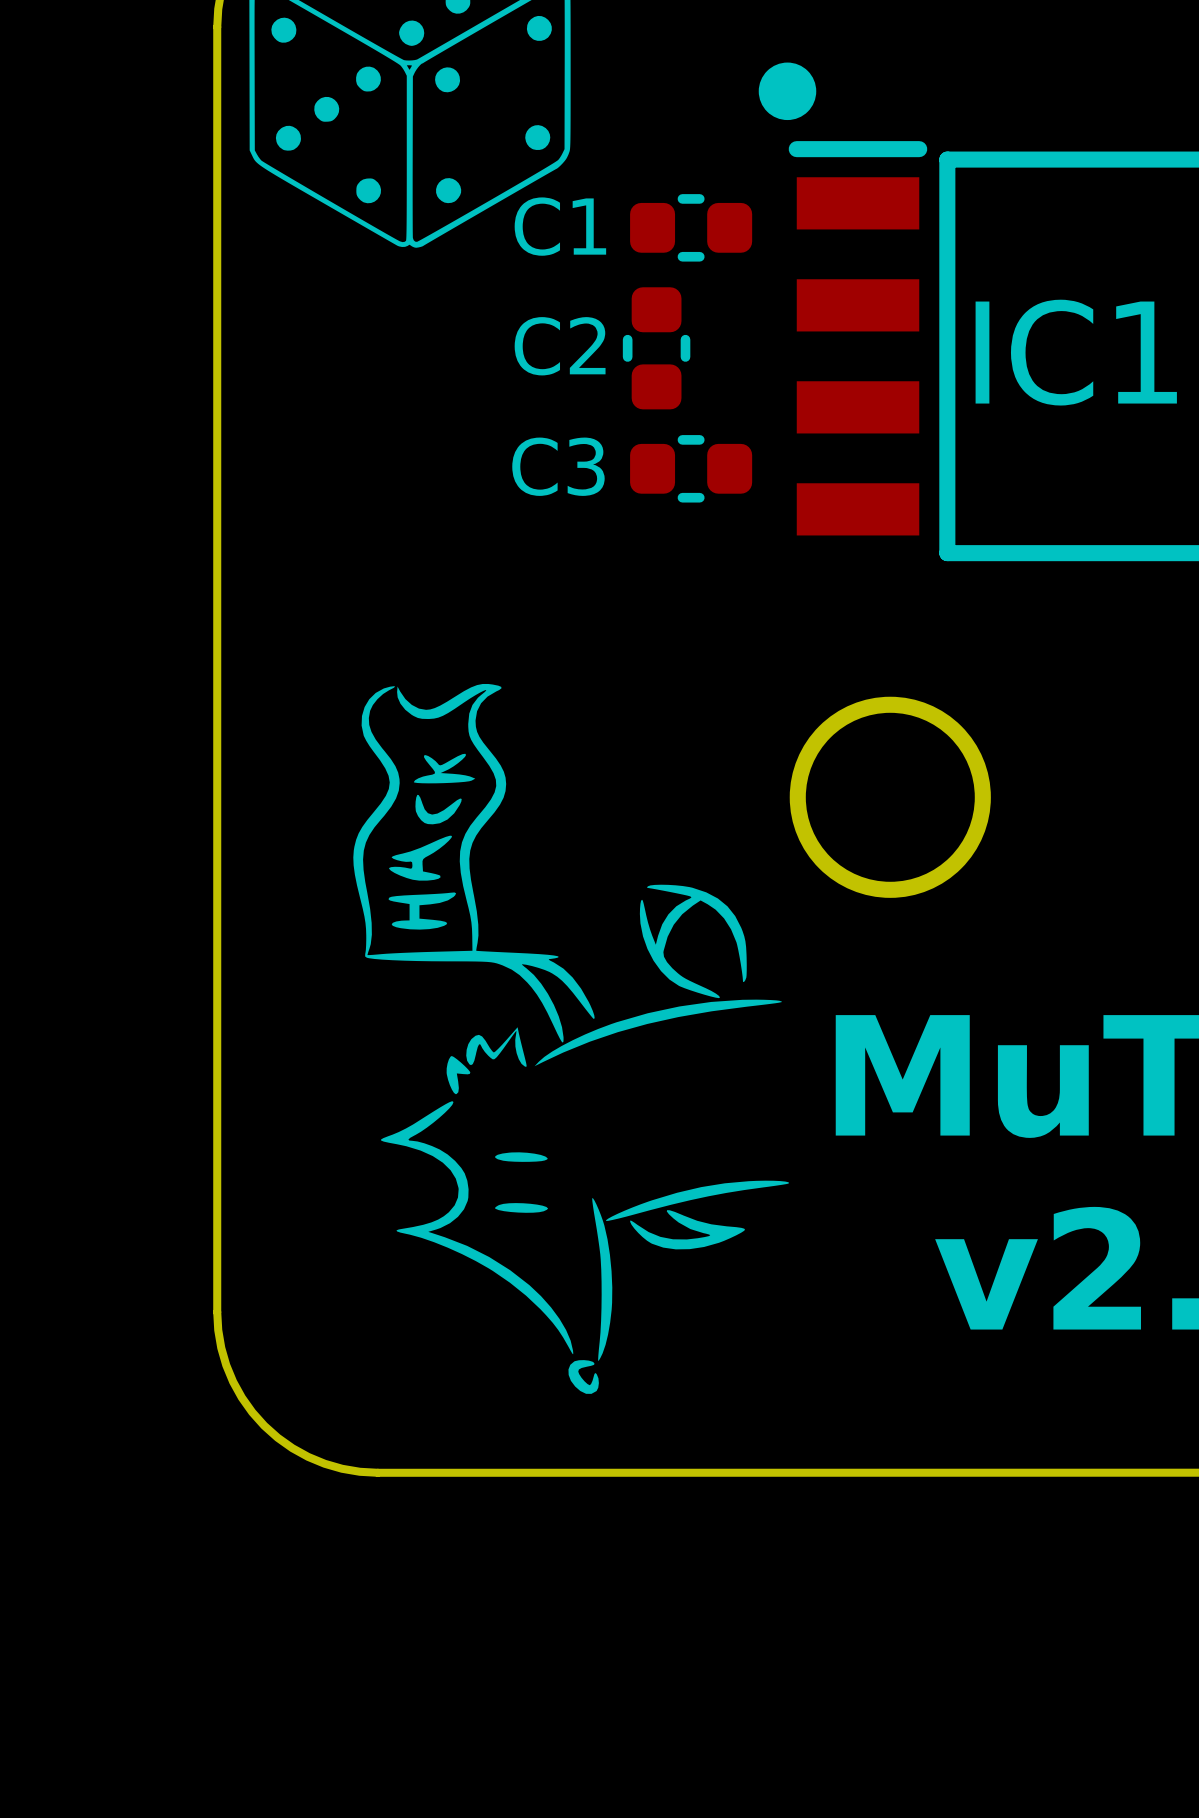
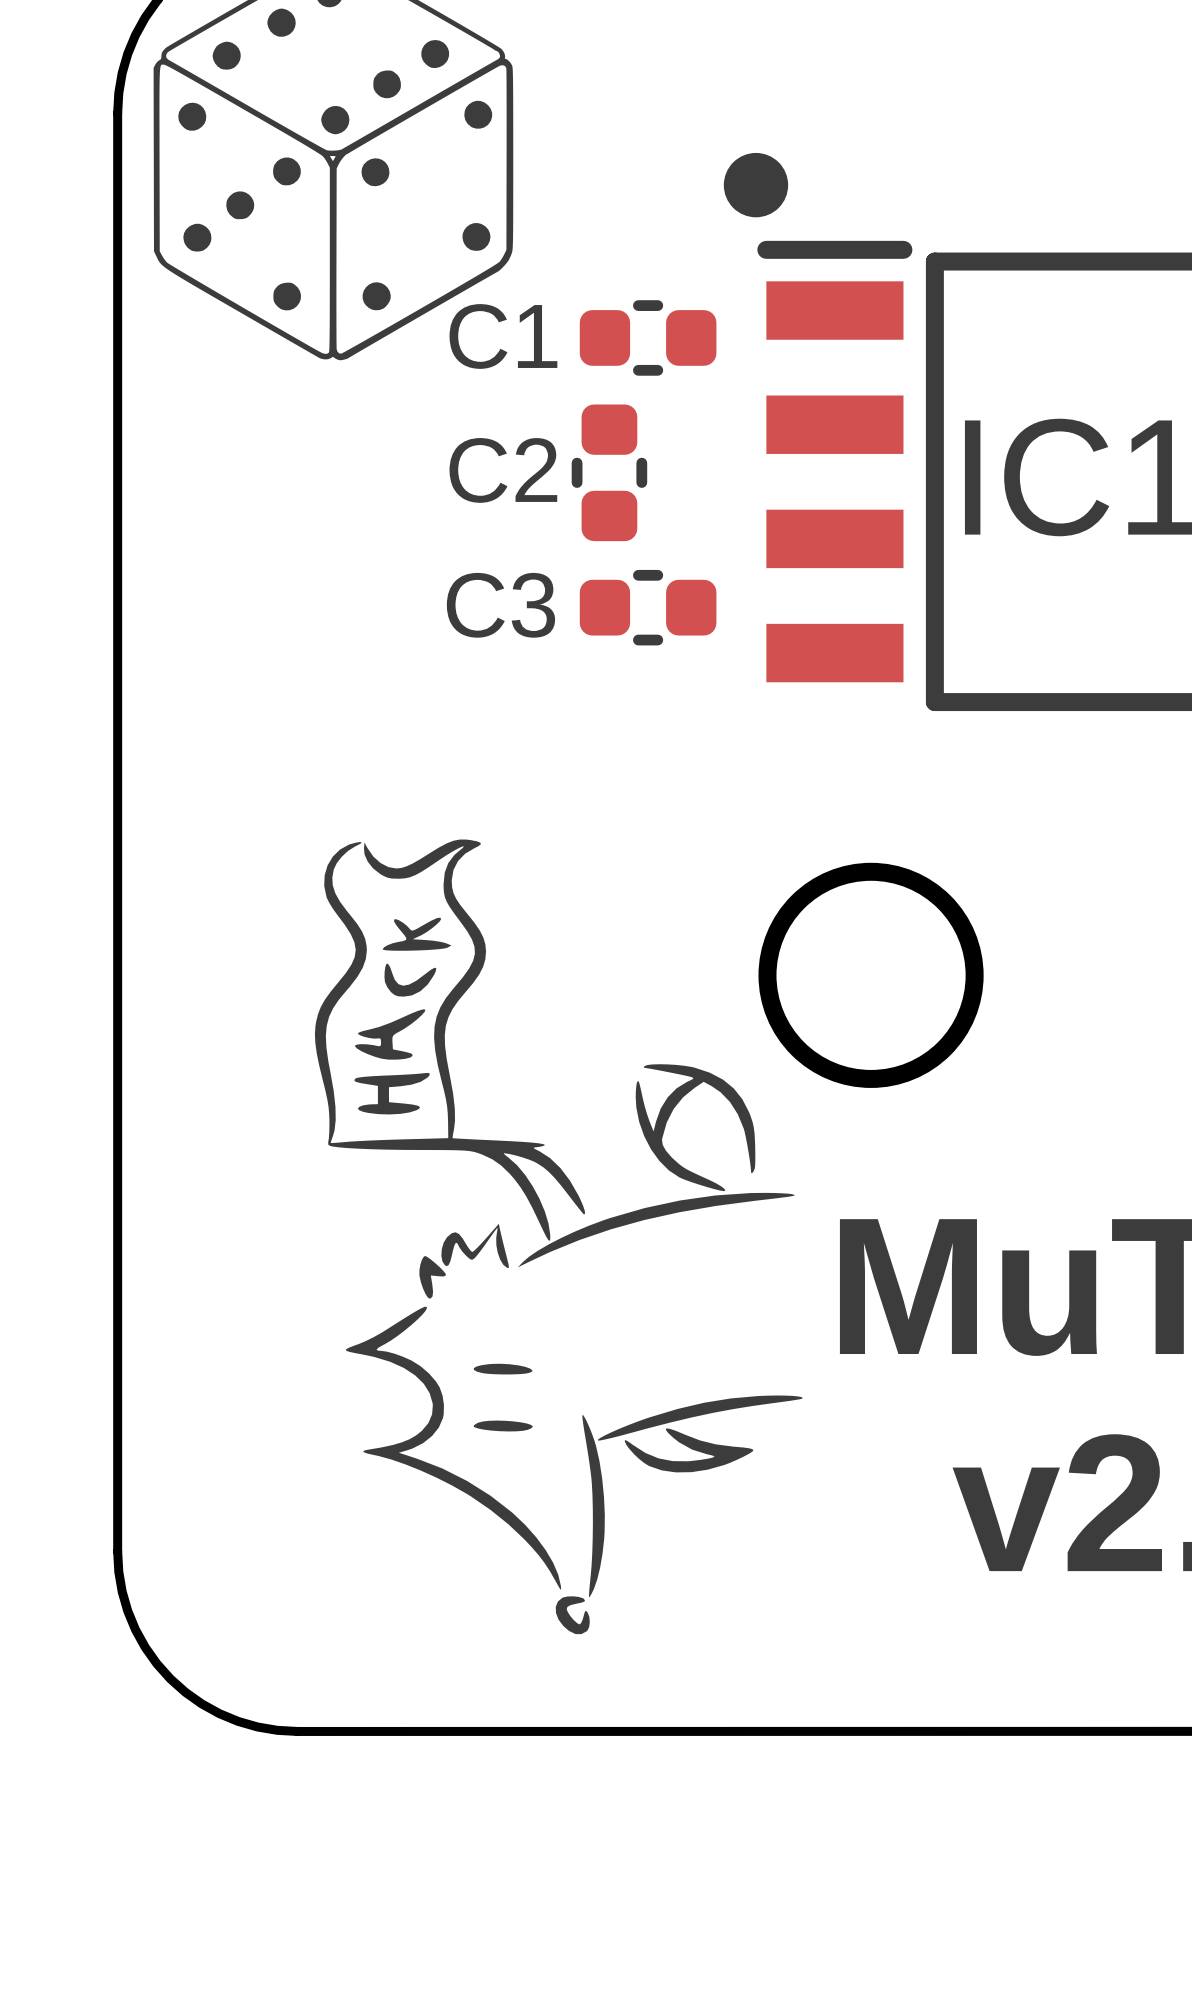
drawing position: (571, 1038) -> (558, 1236)

